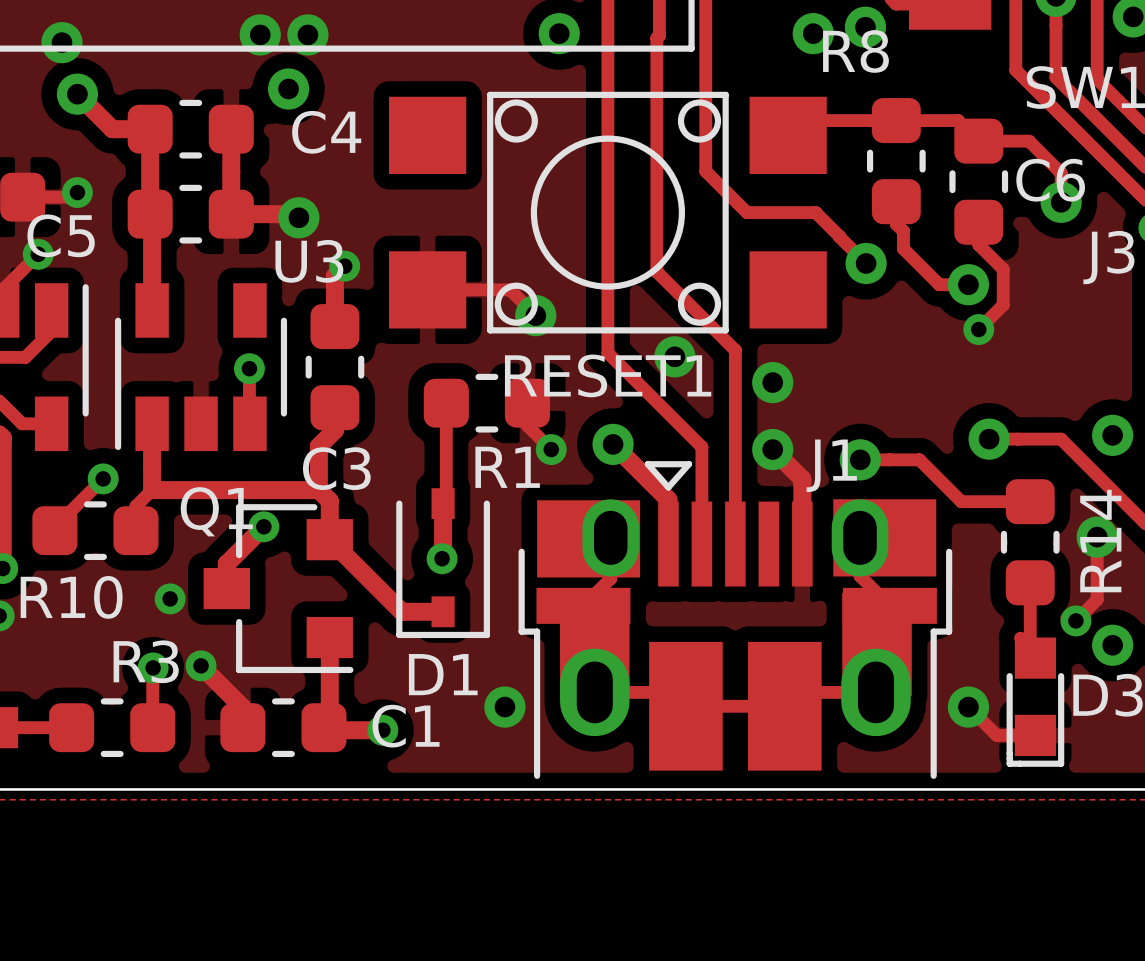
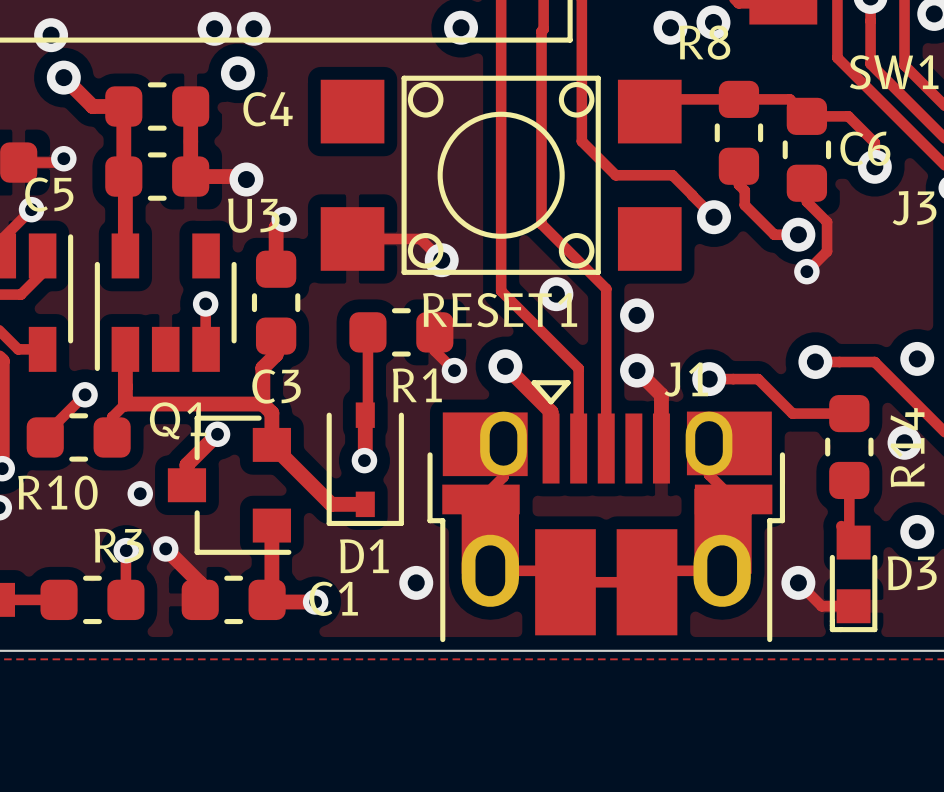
track: (1097, 537) (1097, 599) (1075, 620) -> none
via: (1075, 620) -> none

